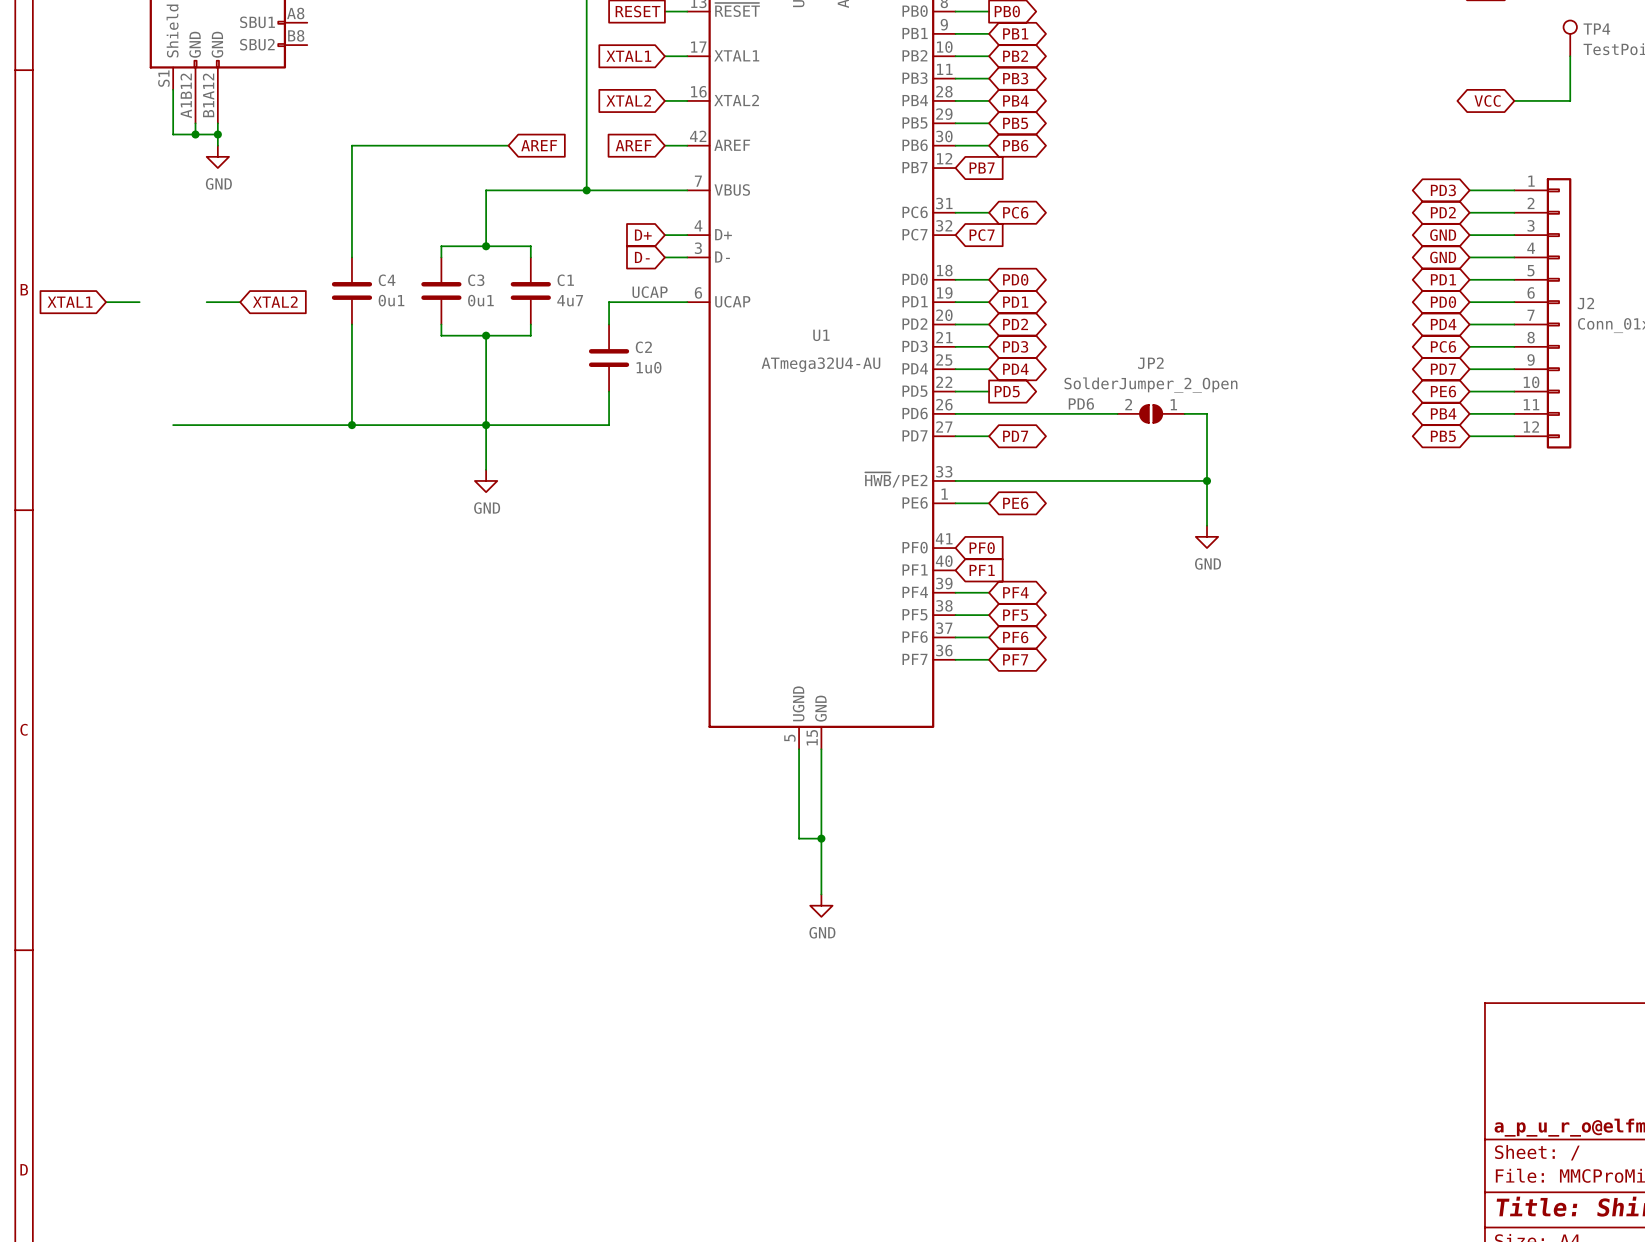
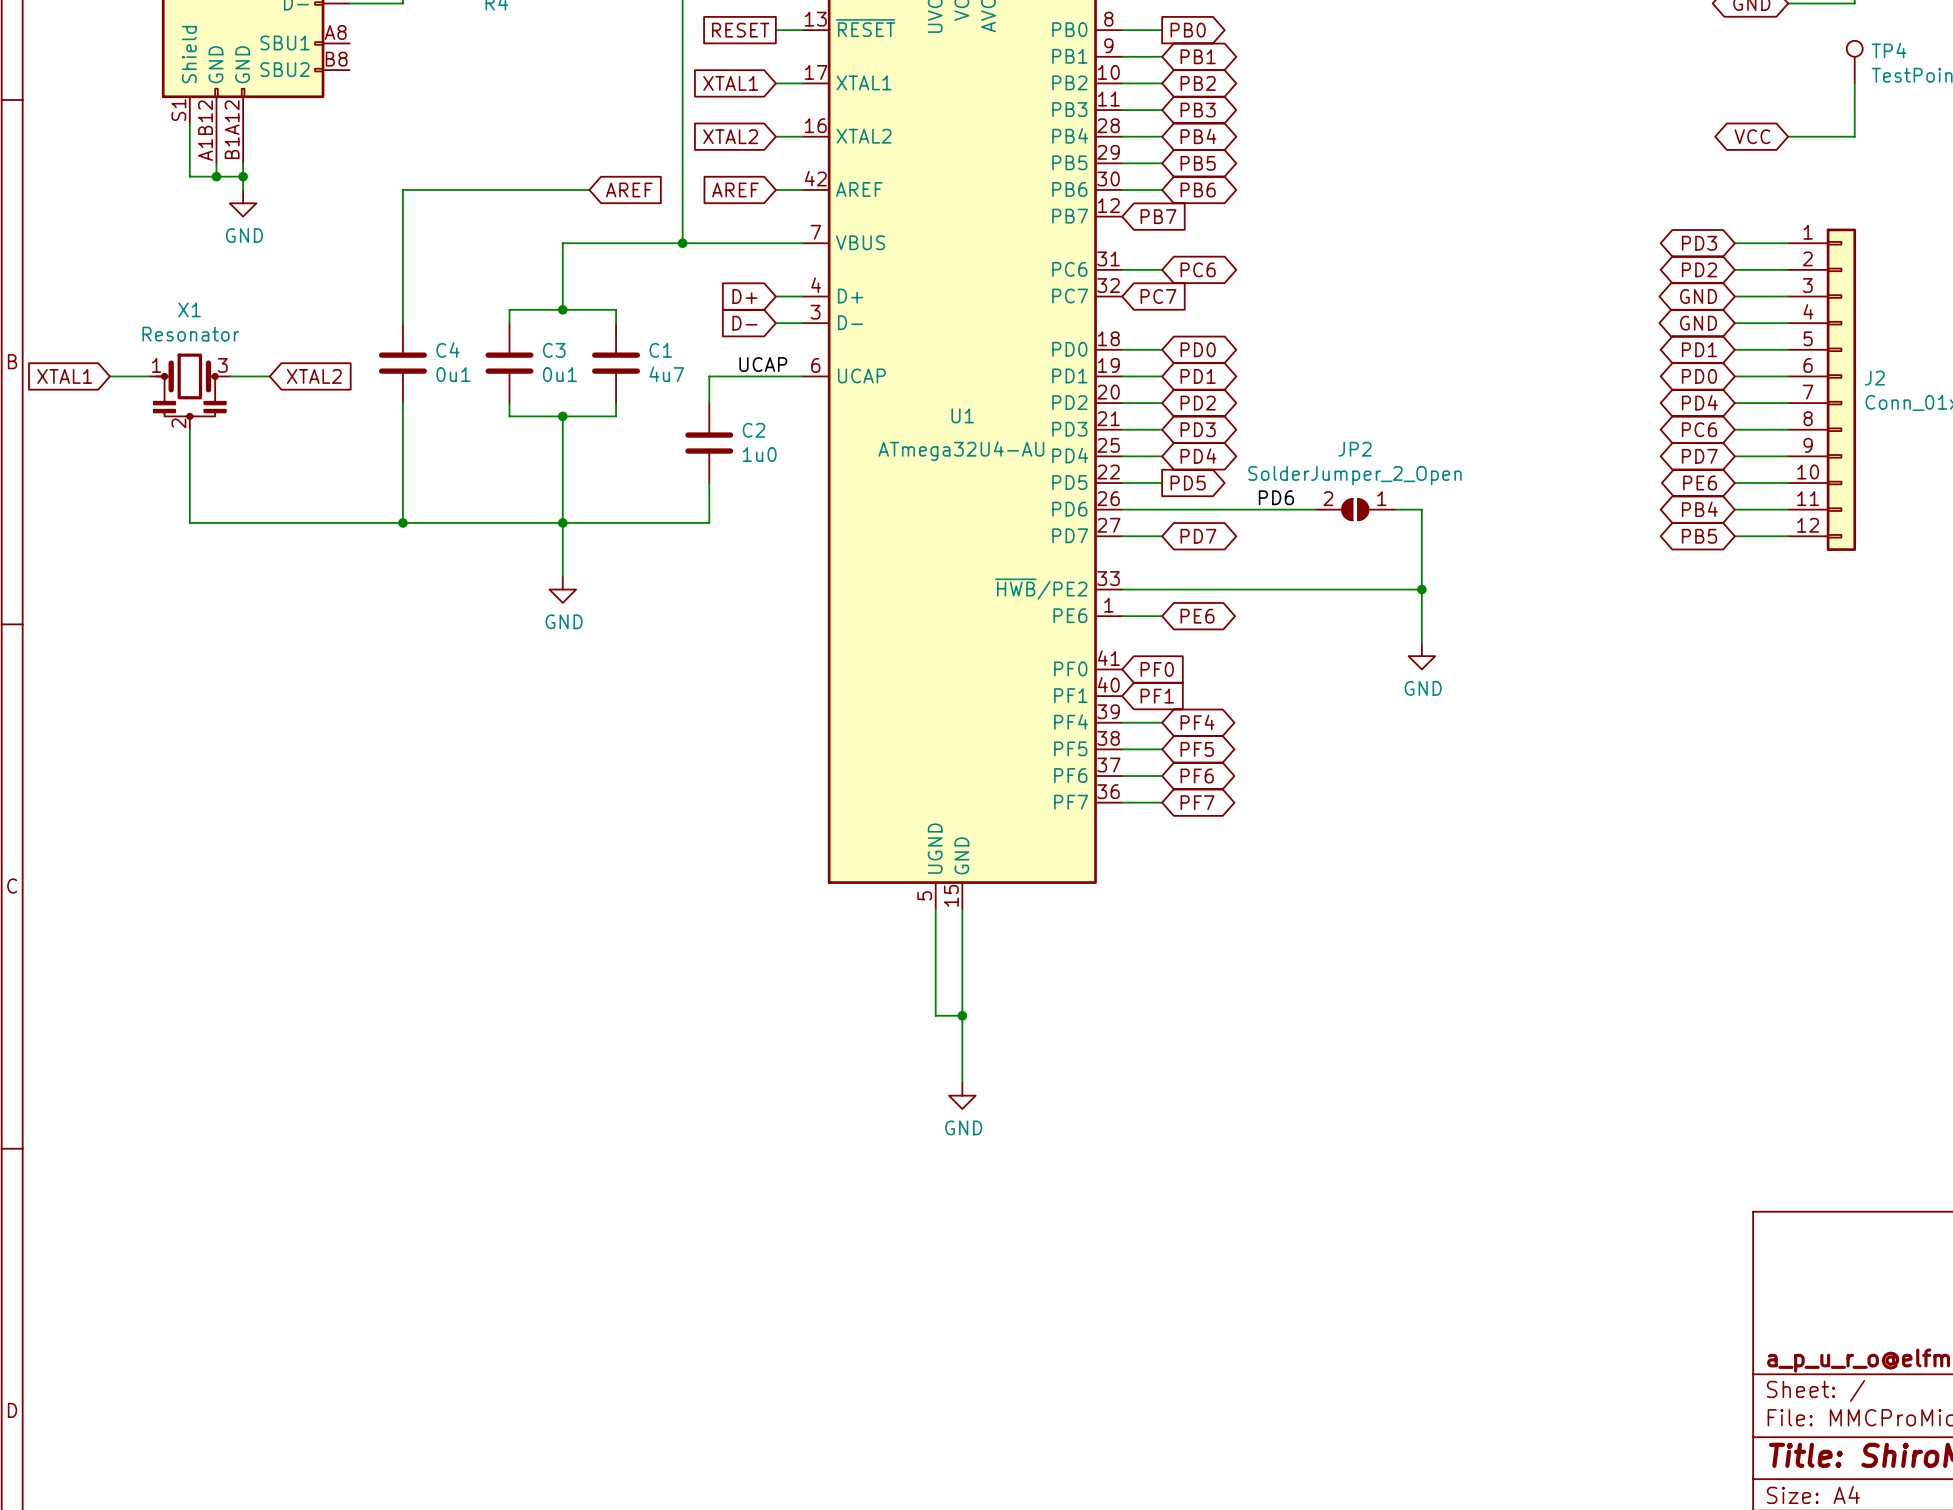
X1: none -> Resonator (189, 391)
wire: none -> (189, 429) (189, 522)

